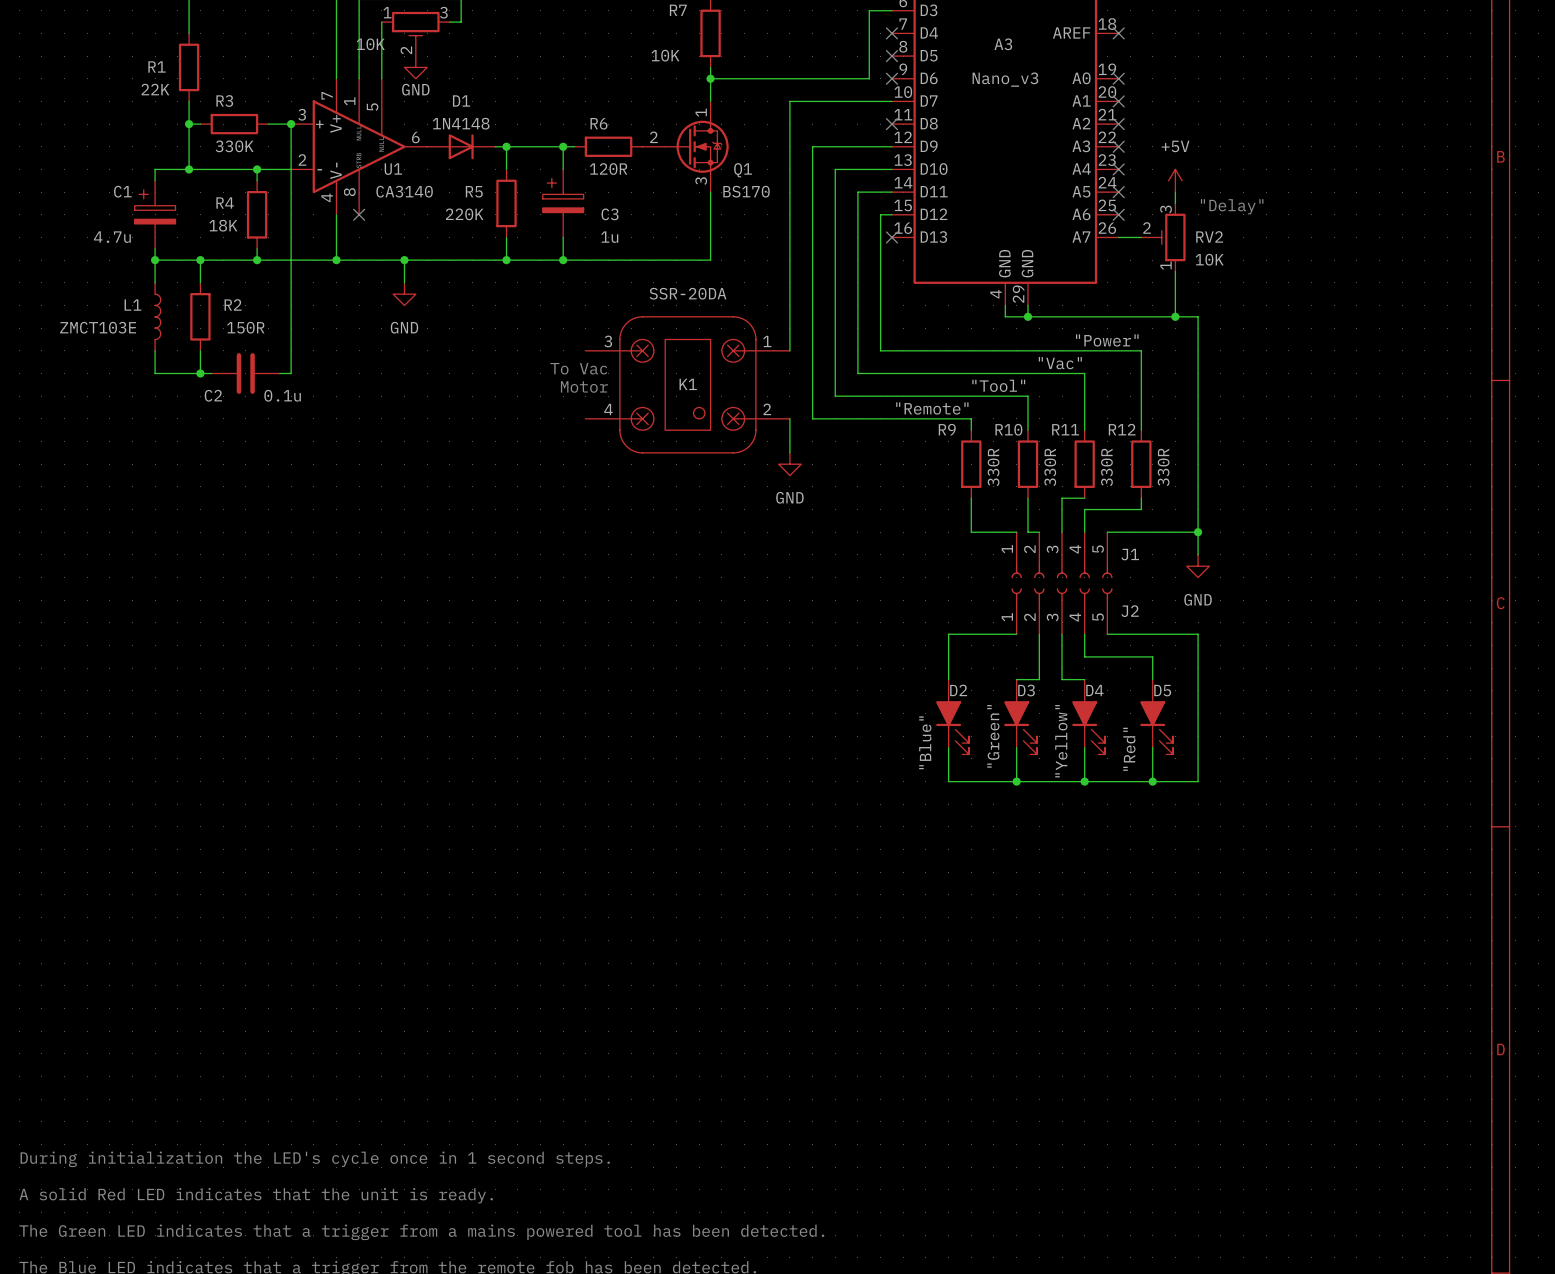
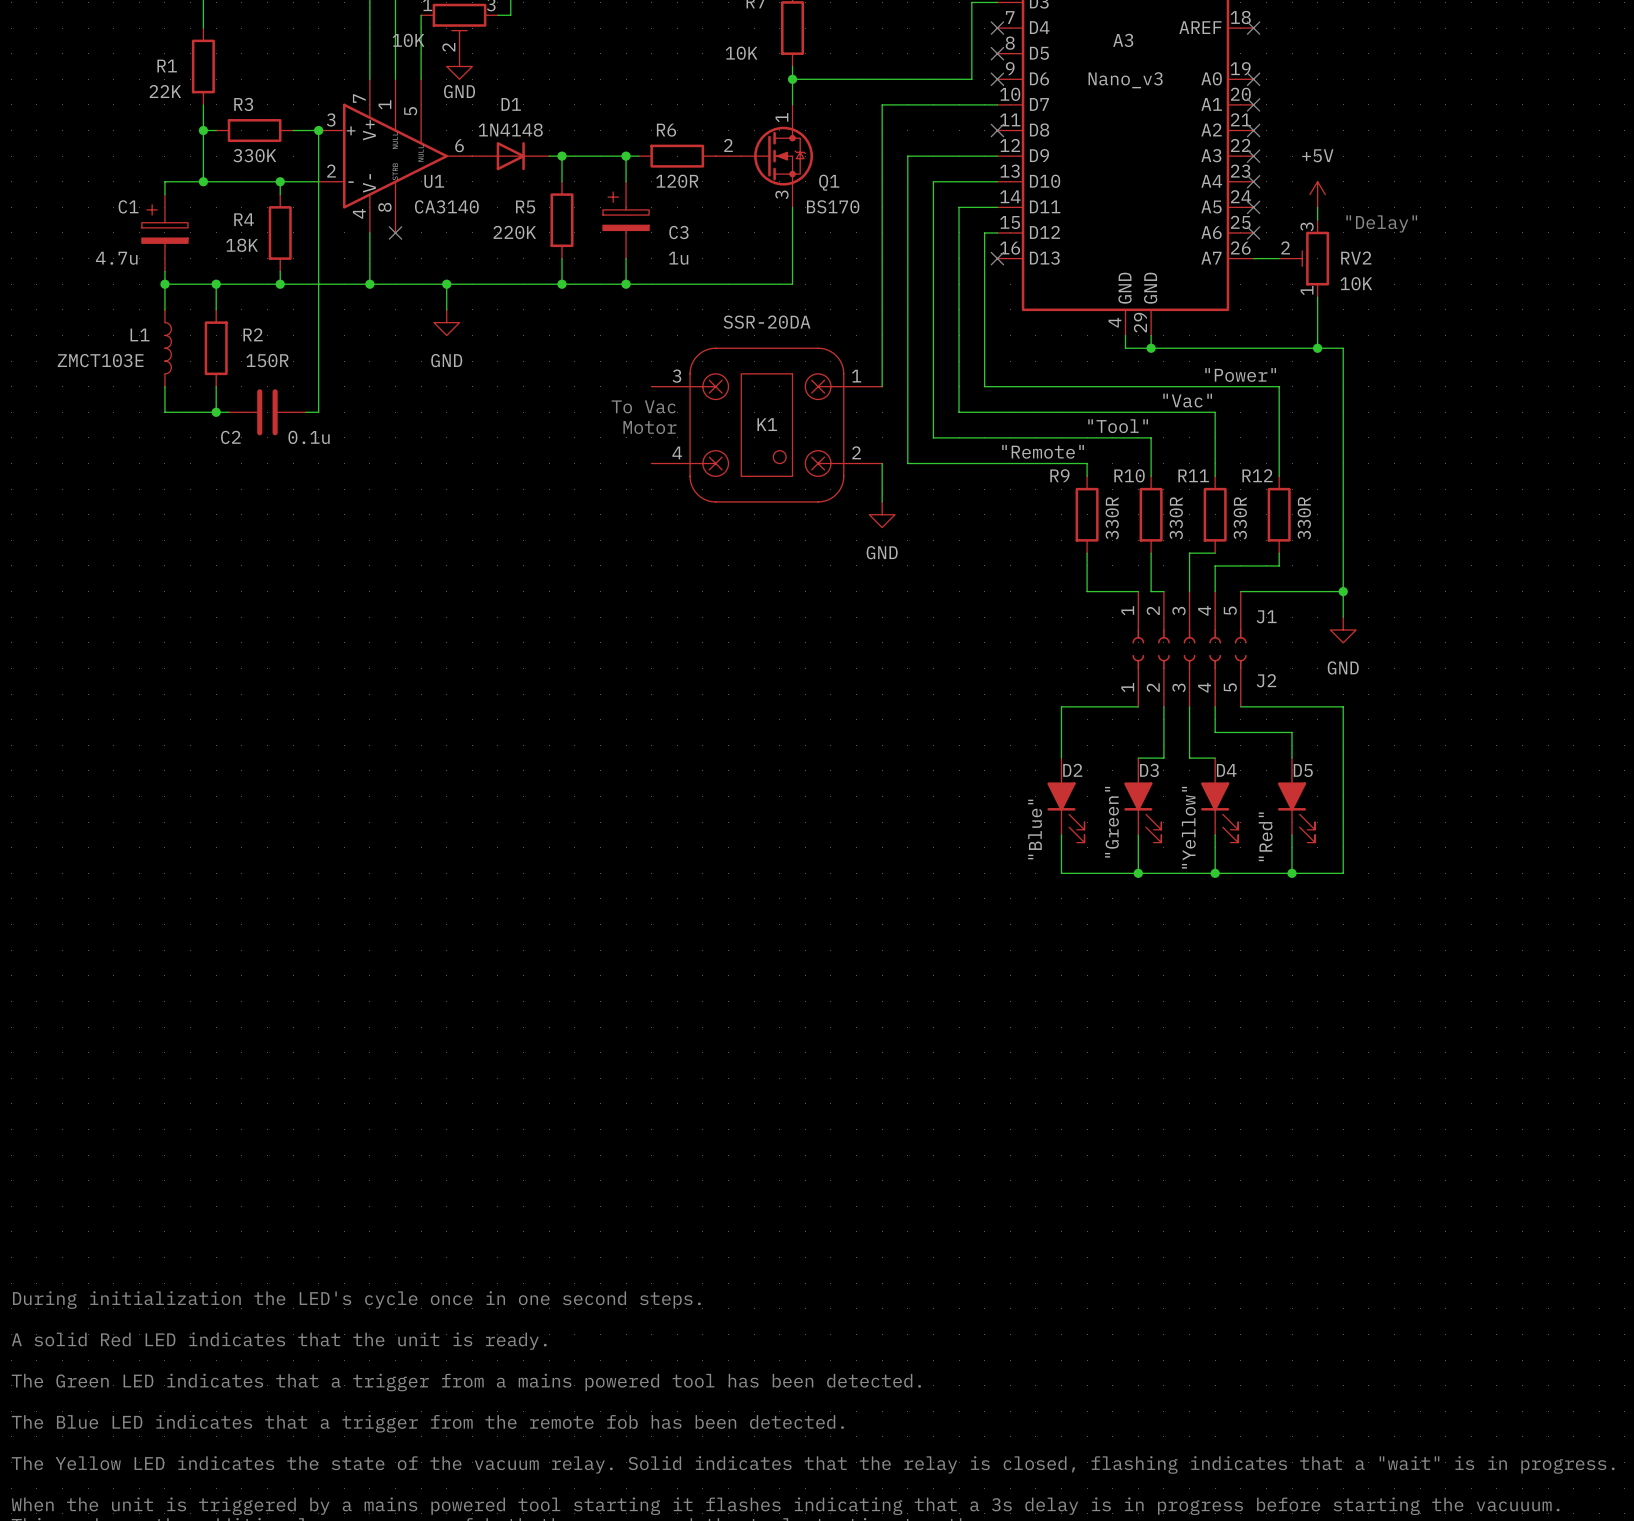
text: During initialization the LED's cycle once in 1 second steps. (315, 1159) -> During initialization the LED's cycle once in one second steps. (356, 1300)

